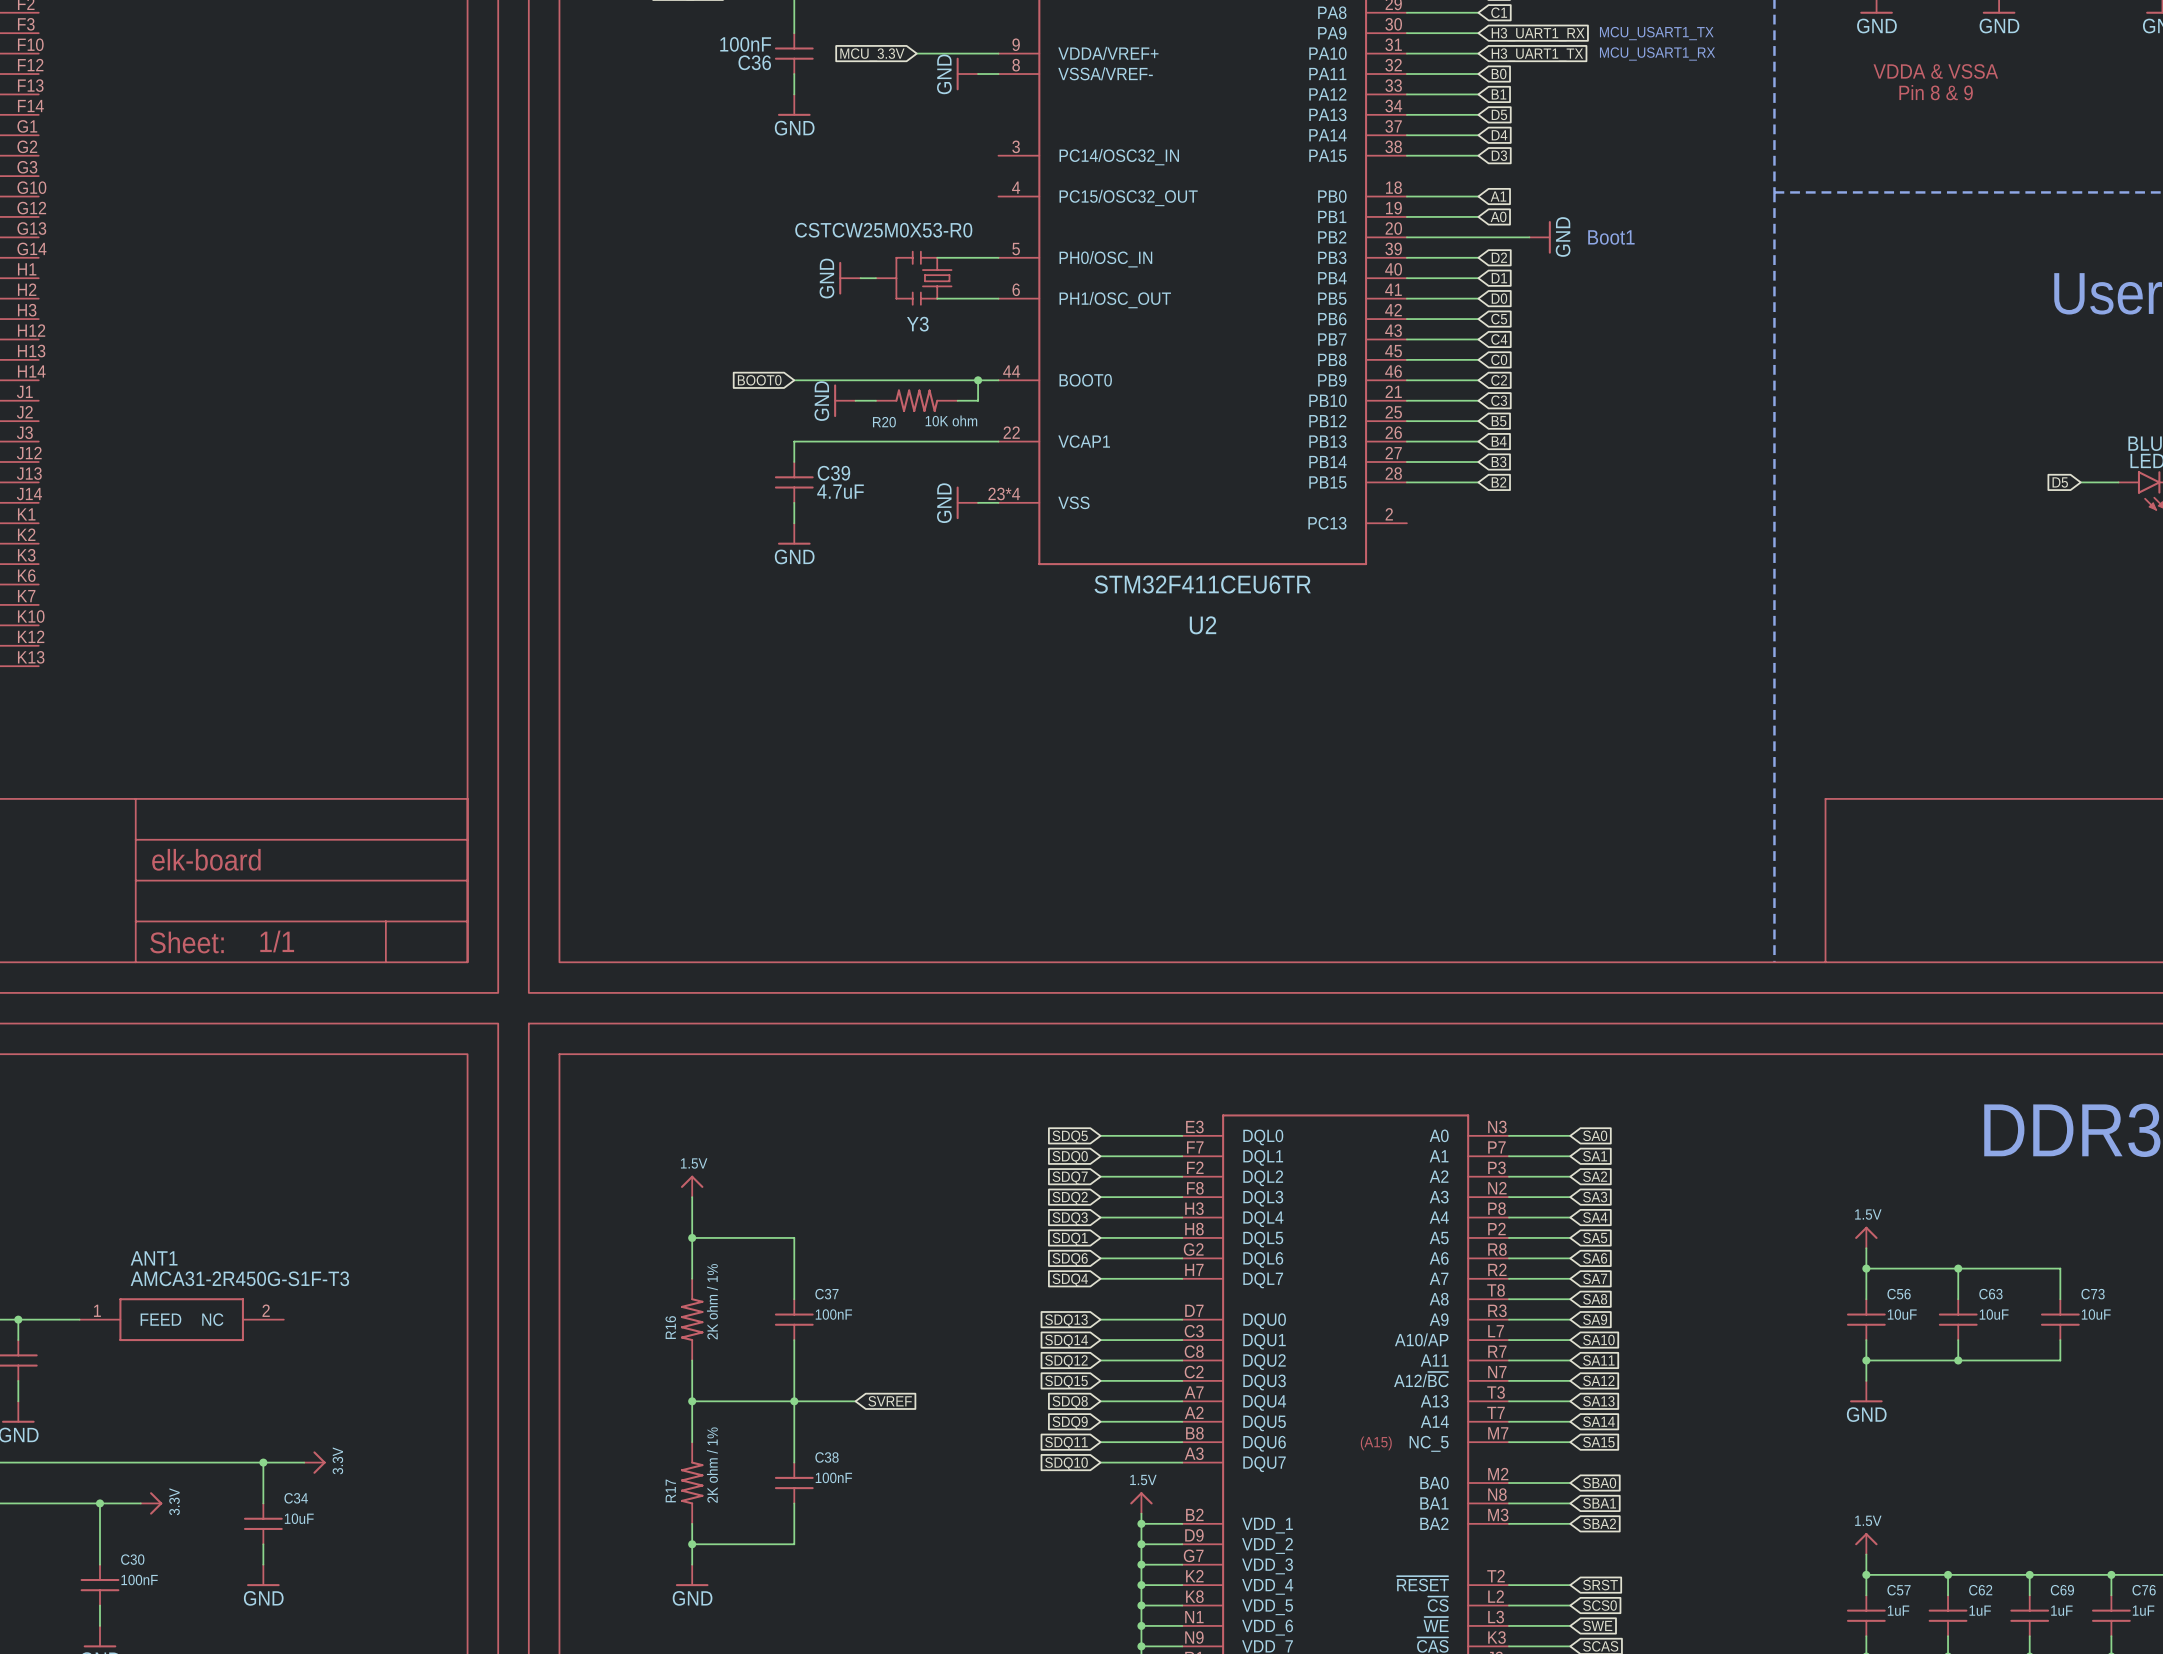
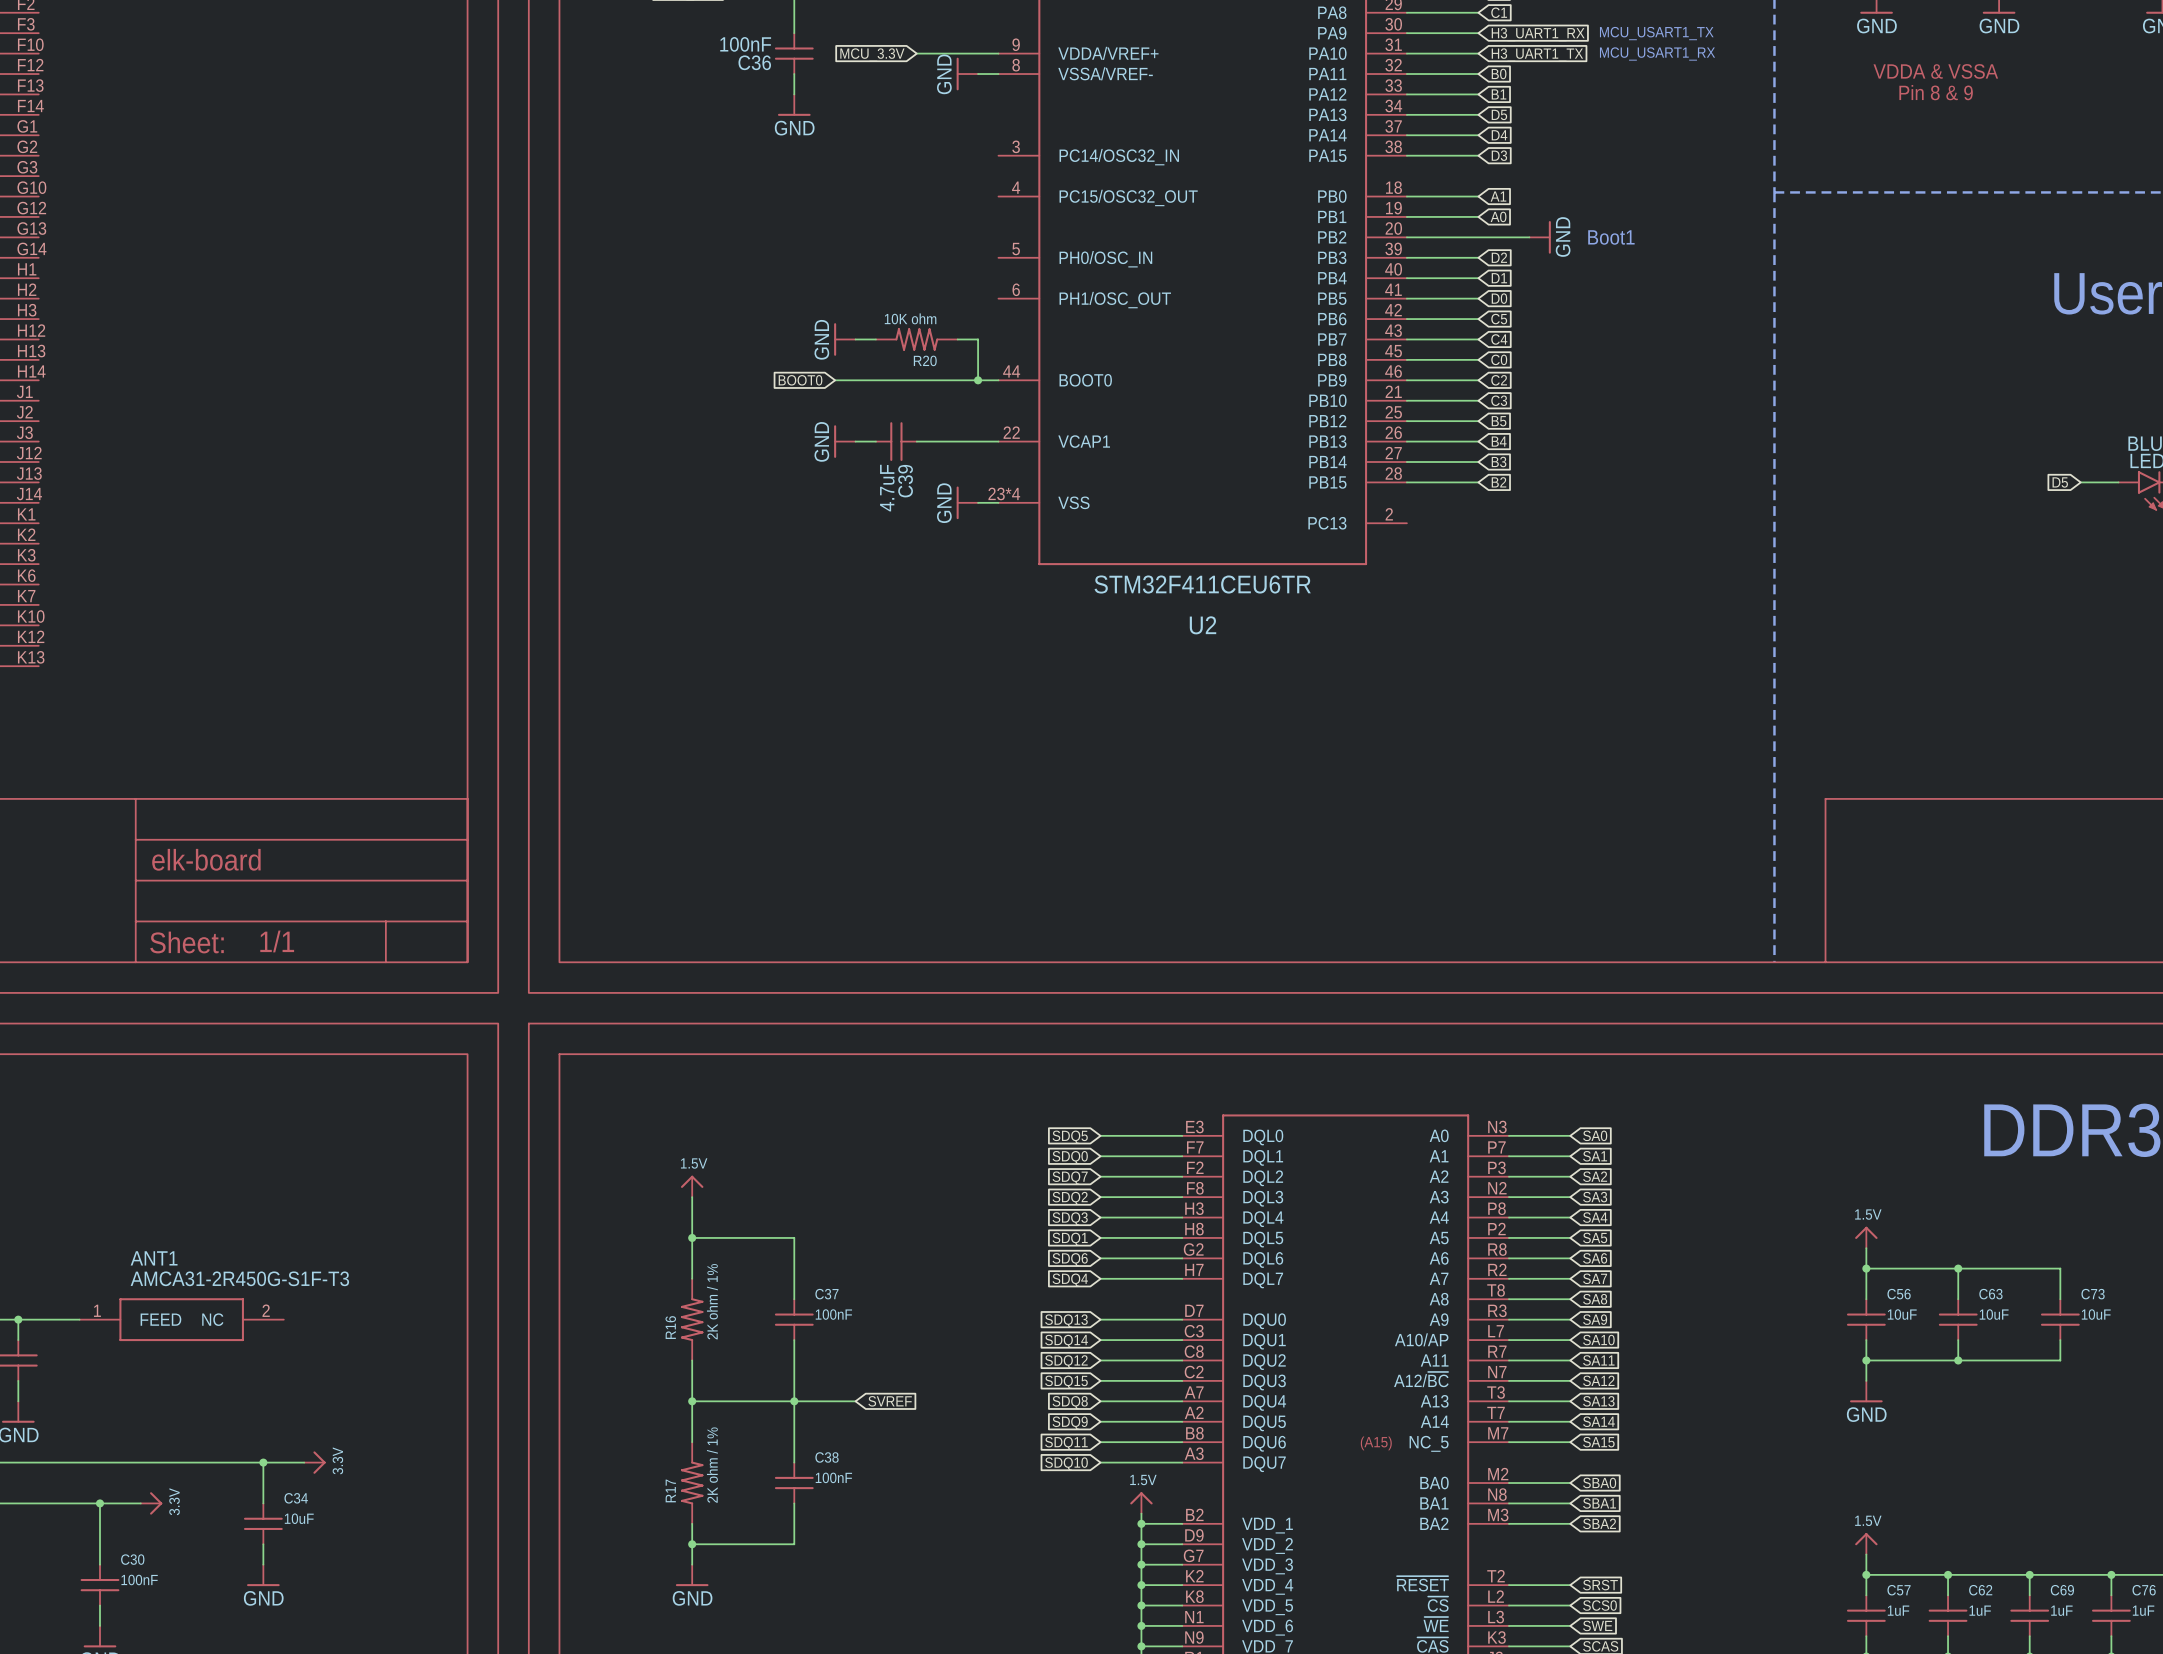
wire: (937, 257) (998, 257) -> none
power symbol: GND (849, 278) -> none
wire: (860, 278) (875, 278) -> none
Y3: CSTCW25M0X53-R0 (913, 278) -> none
wire: (937, 298) (998, 298) -> none
power symbol: none -> GND (844, 339)
global label position: BOOT0 (759, 380) -> BOOT0 (800, 380)
wire: (794, 380) (835, 380) -> none
wire: (978, 380) (978, 400) (957, 400) -> (978, 380) (978, 339) (957, 339)
power symbol: GND (844, 400) -> none
wire: (855, 400) (875, 400) -> (855, 339) (875, 339)
R20 position: (916, 400) -> (916, 339)
R20 value position: 10K ohm (951, 420) -> 10K ohm (910, 318)
R20 name position: R20 (884, 422) -> R20 (925, 360)
power symbol: none -> GND (844, 441)
wire: (855, 441) (794, 441) (794, 461) -> none
C39 rotation: 0° (794, 482) -> 90° clockwise (896, 441)
C39 position: (794, 482) -> (896, 441)
wire: (794, 502) (794, 523) -> none
power symbol: GND (794, 533) -> none

